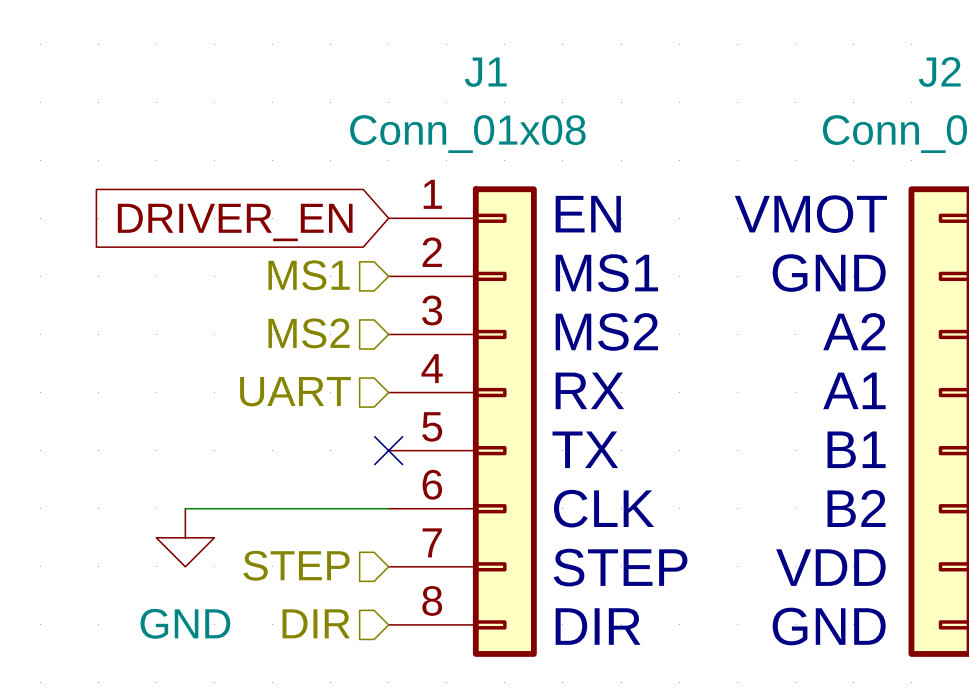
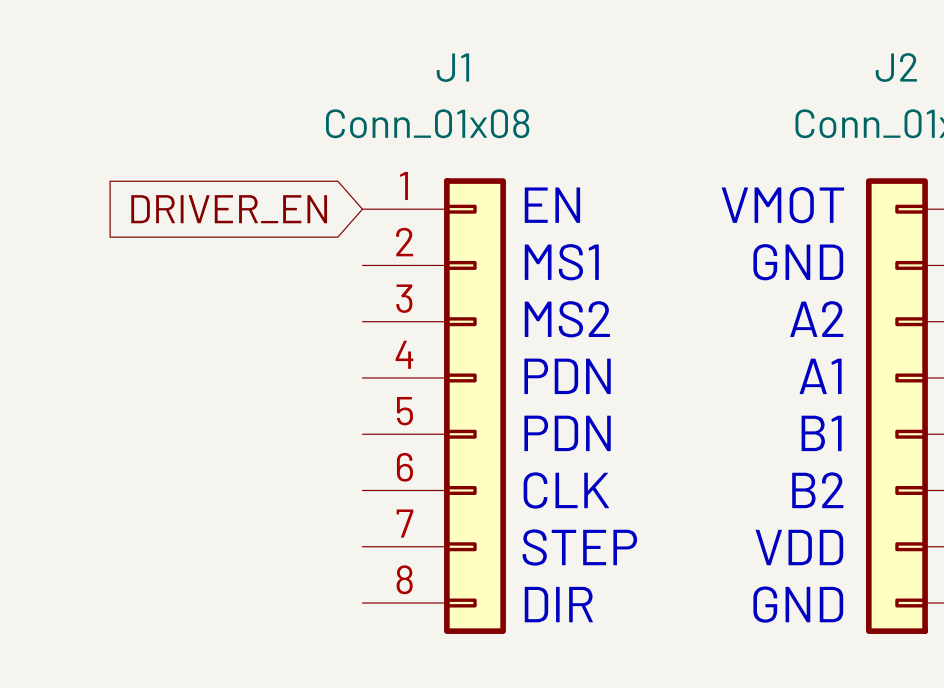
hierarchical label: MS1 (309, 275) -> none
hierarchical label: MS2 (309, 333) -> none
text: RX (589, 390) -> PDN (567, 376)
hierarchical label: UART (295, 391) -> none
text: TX (585, 449) -> PDN (567, 433)
no-connect mark: (388, 450) -> none
wire: (185, 508) (388, 508) -> none
power symbol: GND (185, 537) -> none
hierarchical label: STEP (296, 565) -> none
hierarchical label: DIR (316, 623) -> none

